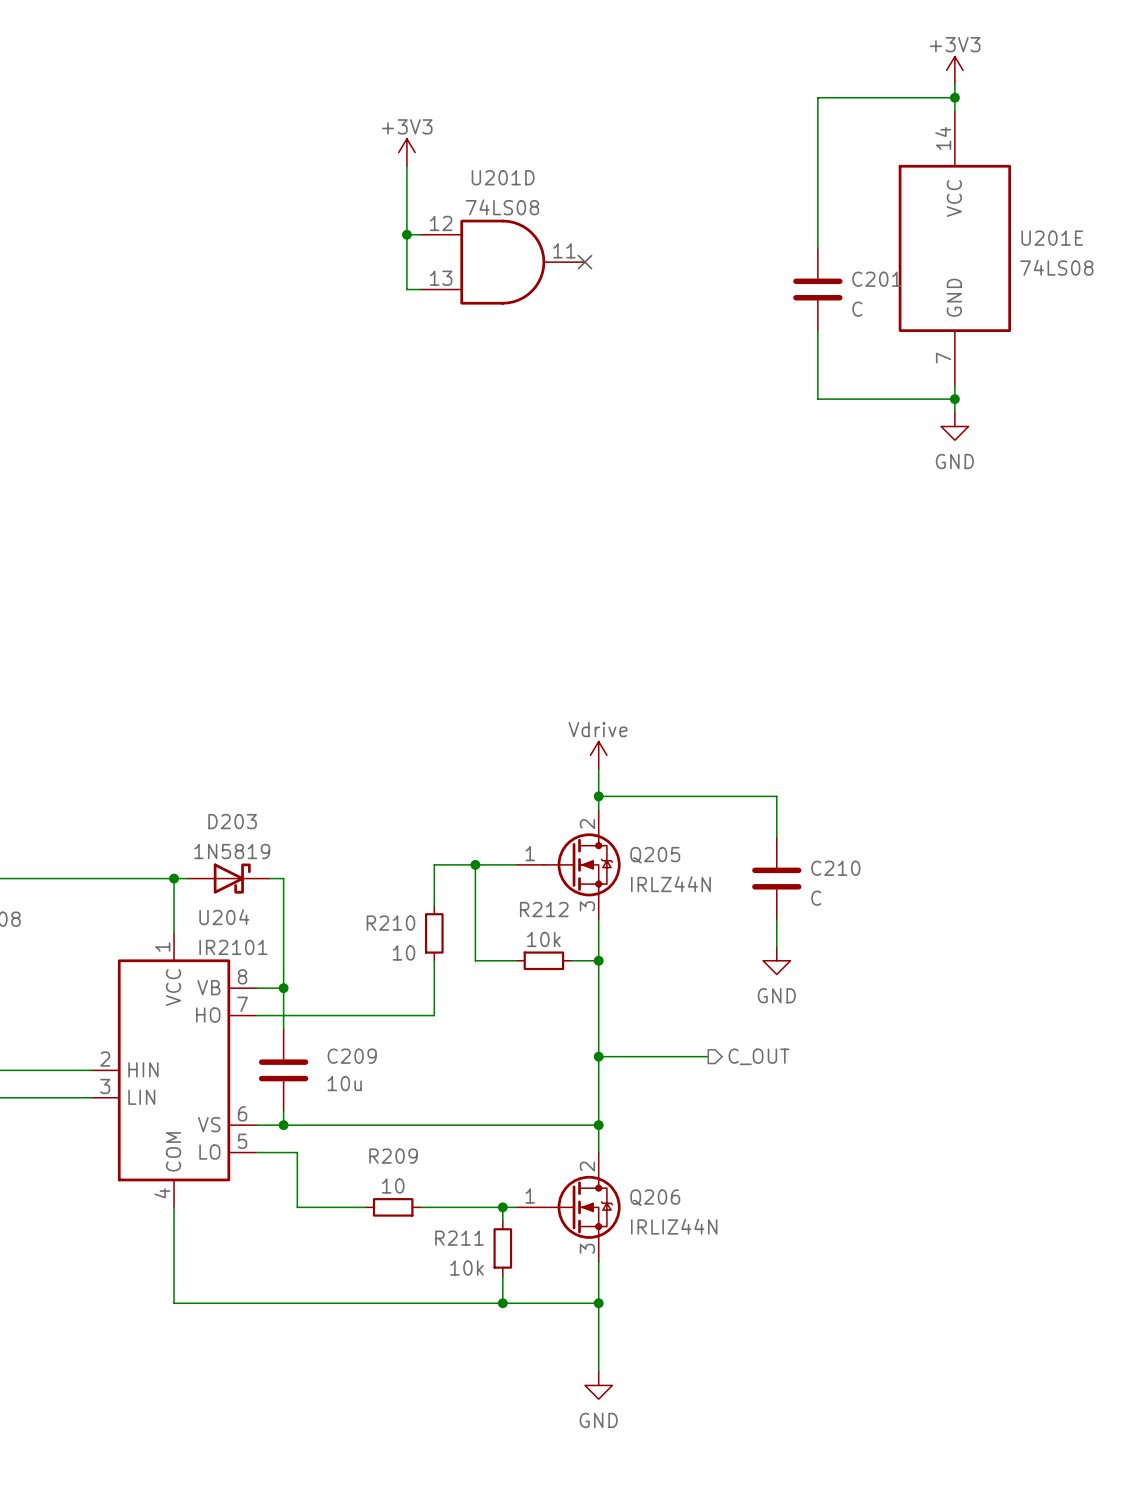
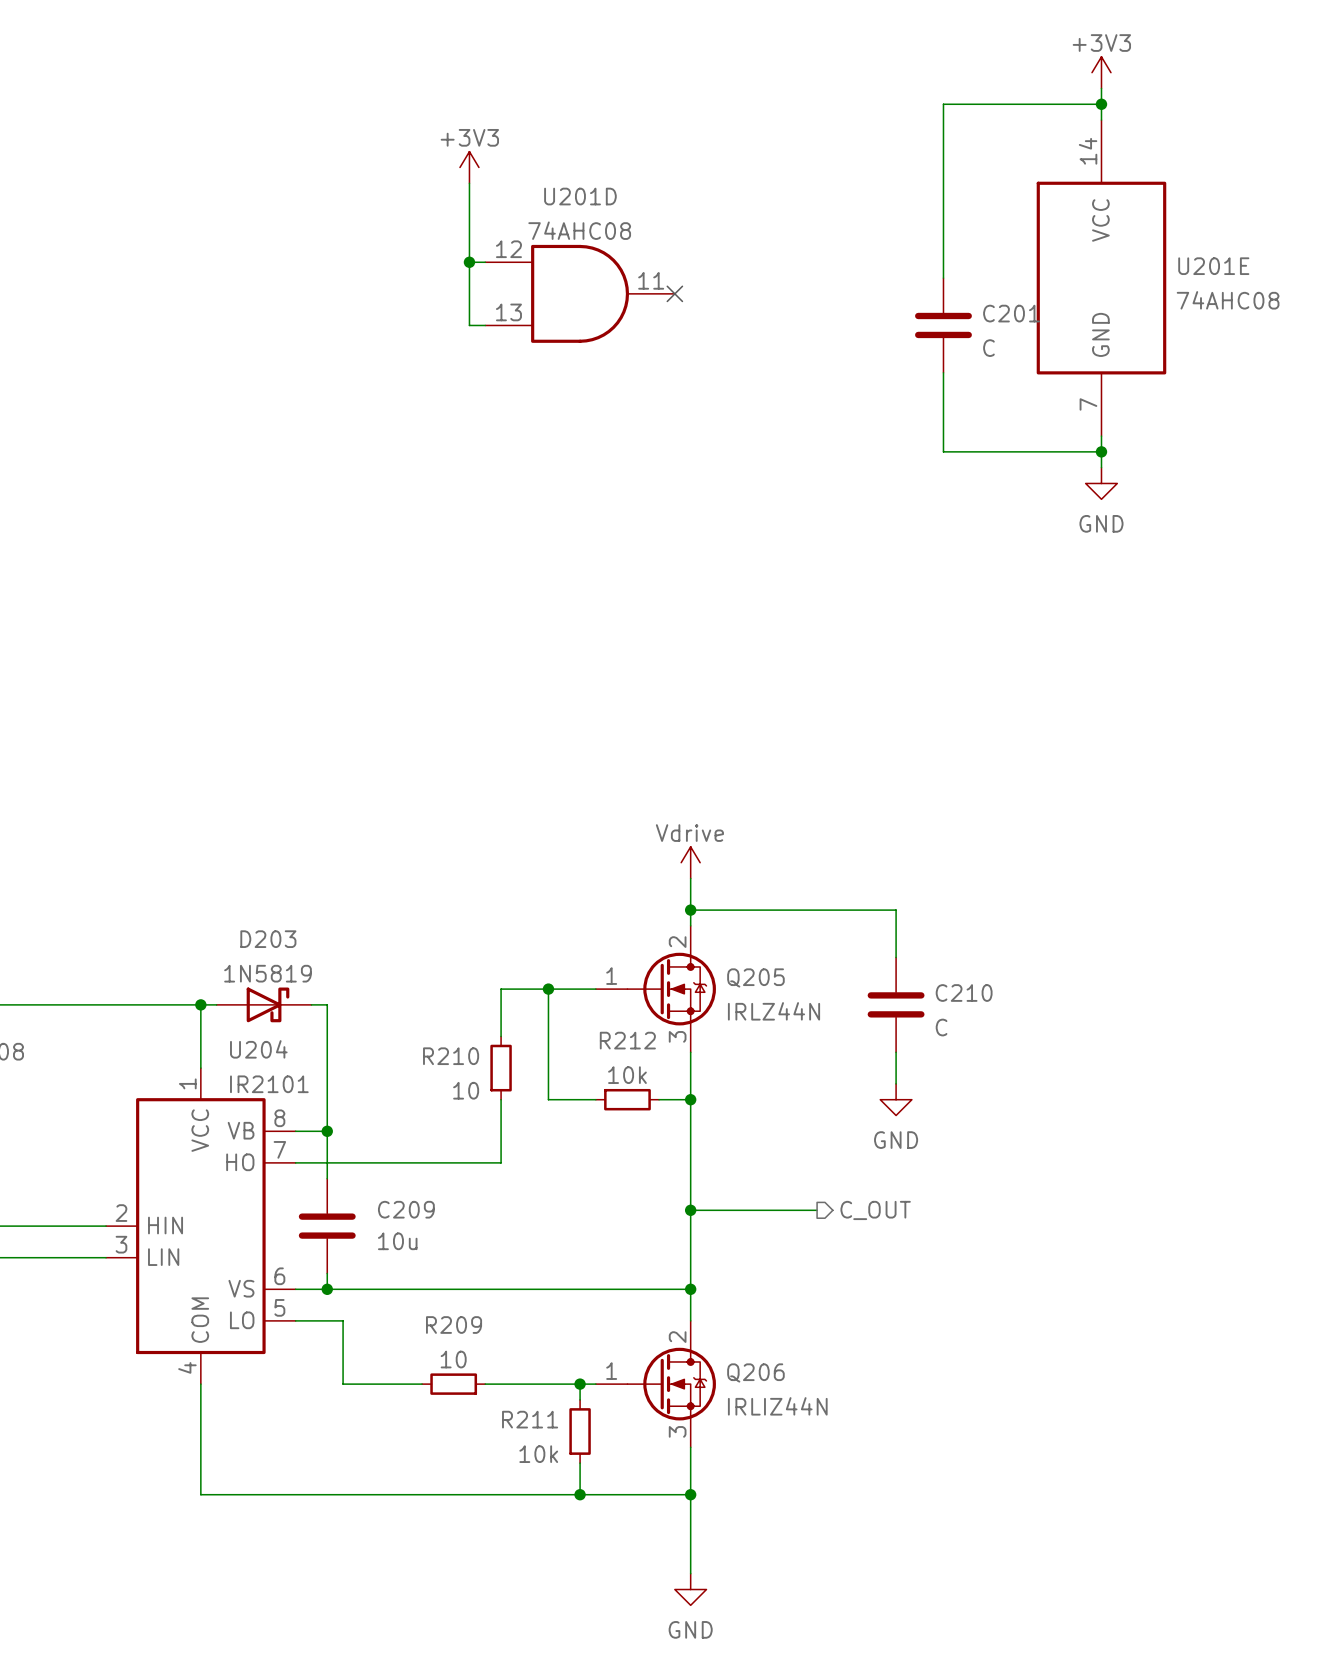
U201D value: 74LS08 (502, 207) -> 74AHC08 (579, 230)
U201E value: 74LS08 (1056, 267) -> 74AHC08 (1228, 300)

